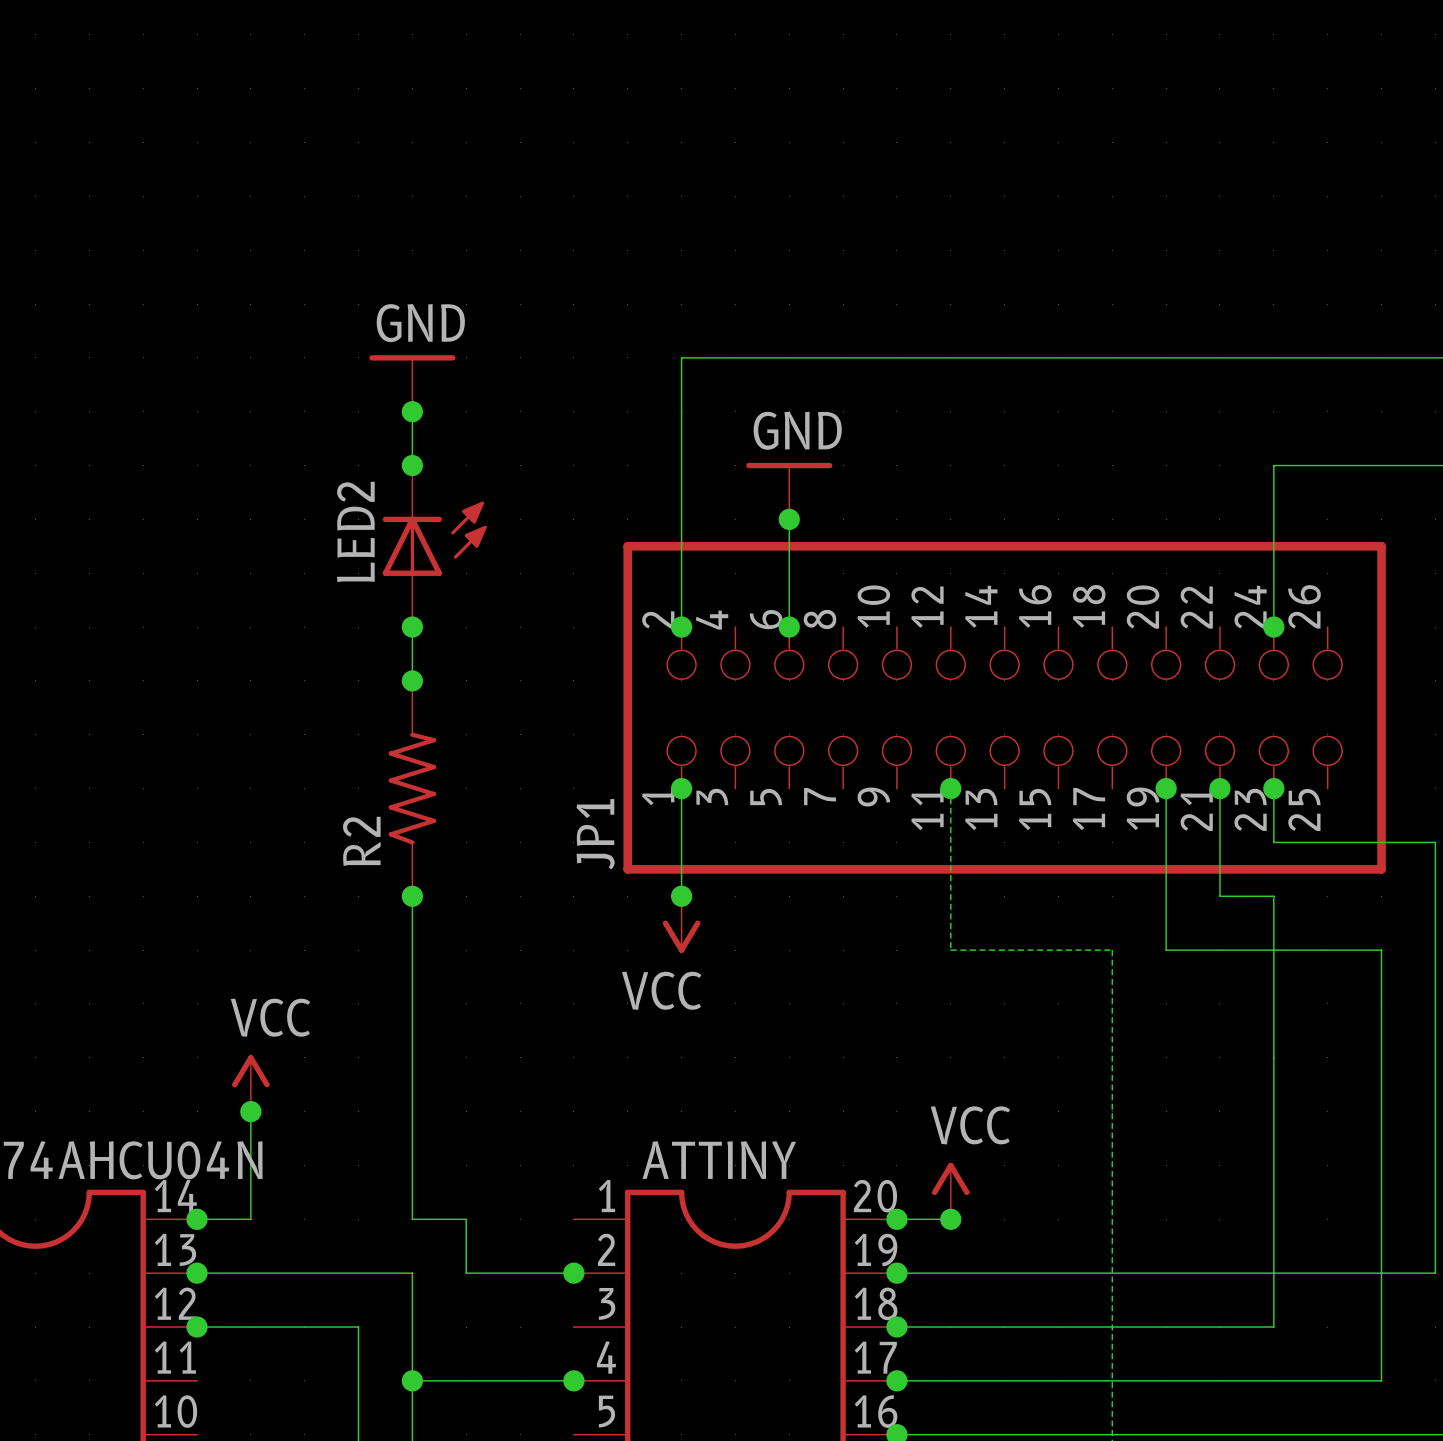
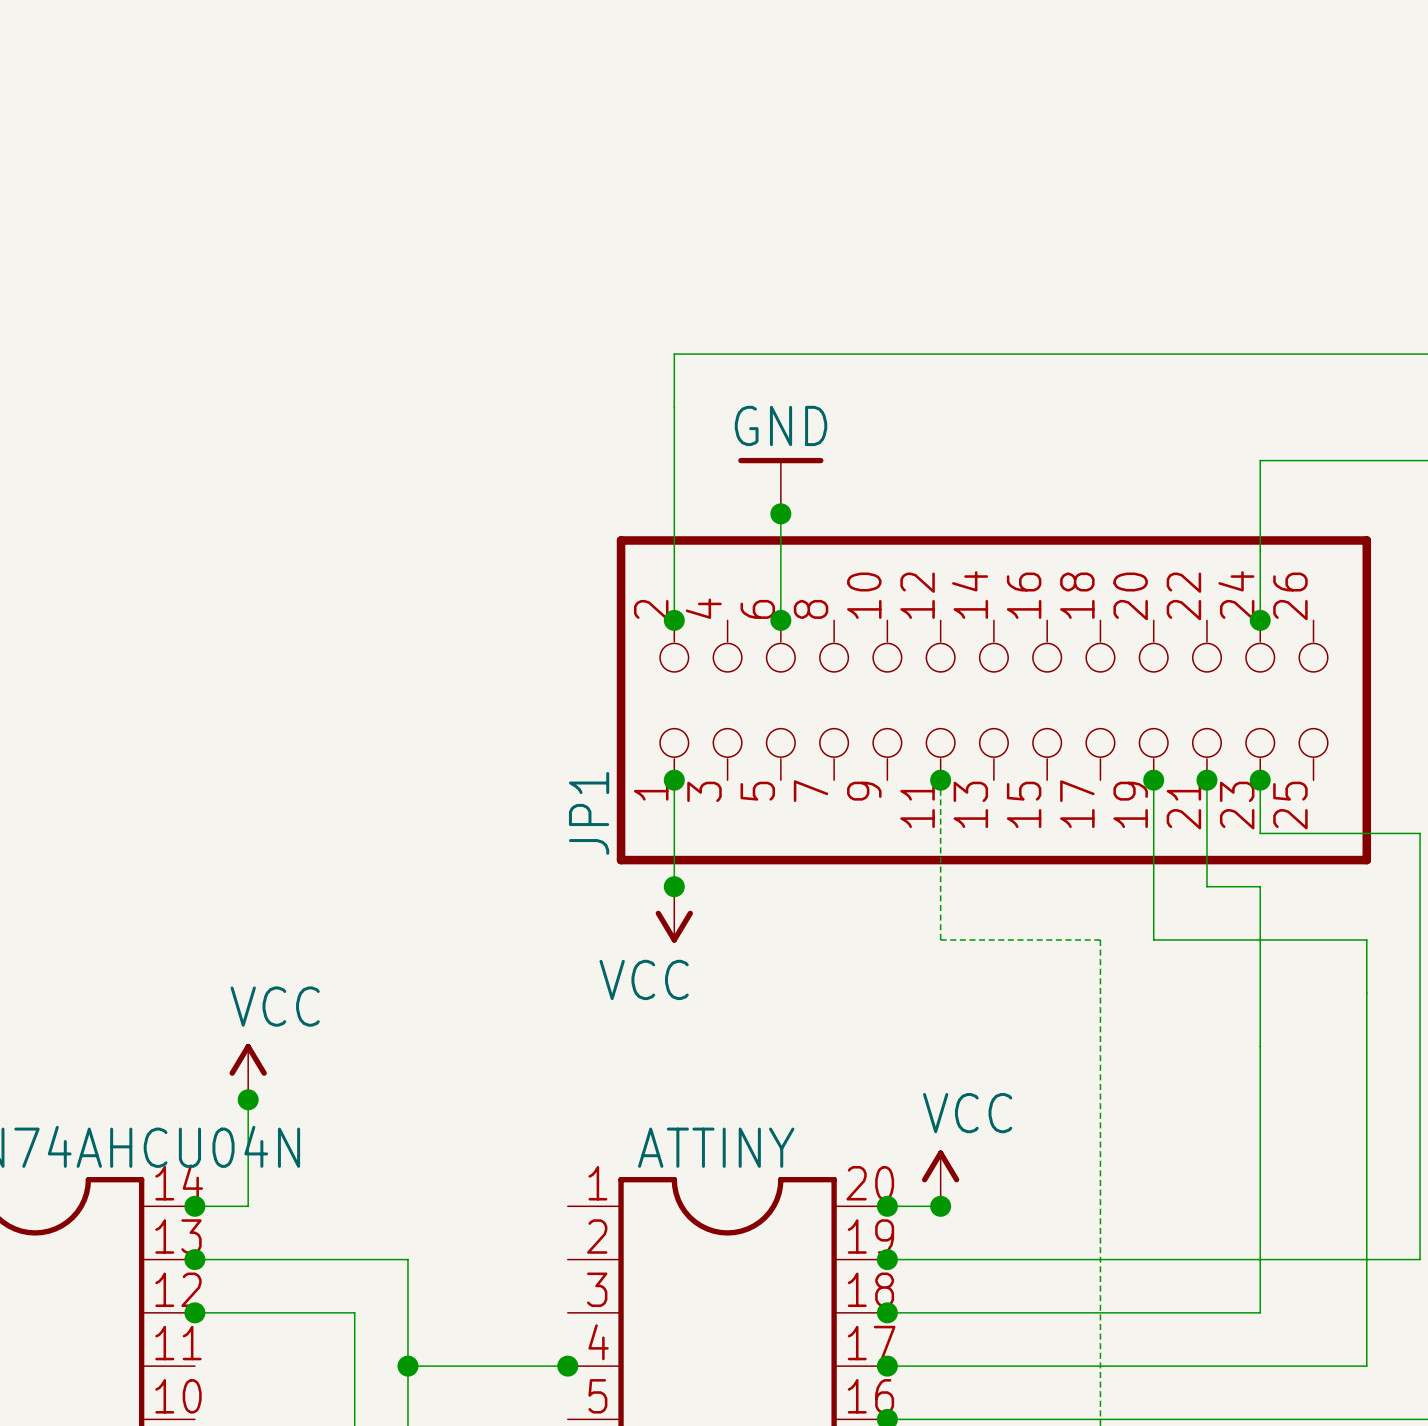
power symbol: GND (412, 383) -> none
wire: (412, 411) (412, 465) -> none
junction: (412, 411) -> none
junction: (412, 465) -> none
LED2: (434, 546) -> none
wire: (412, 627) (412, 680) -> none
junction: (412, 627) -> none
junction: (412, 680) -> none
R2: (412, 788) -> none
wire: (412, 896) (412, 1219) (466, 1219) (466, 1273) (573, 1273) -> none
junction: (412, 896) -> none
junction: (573, 1273) -> none

